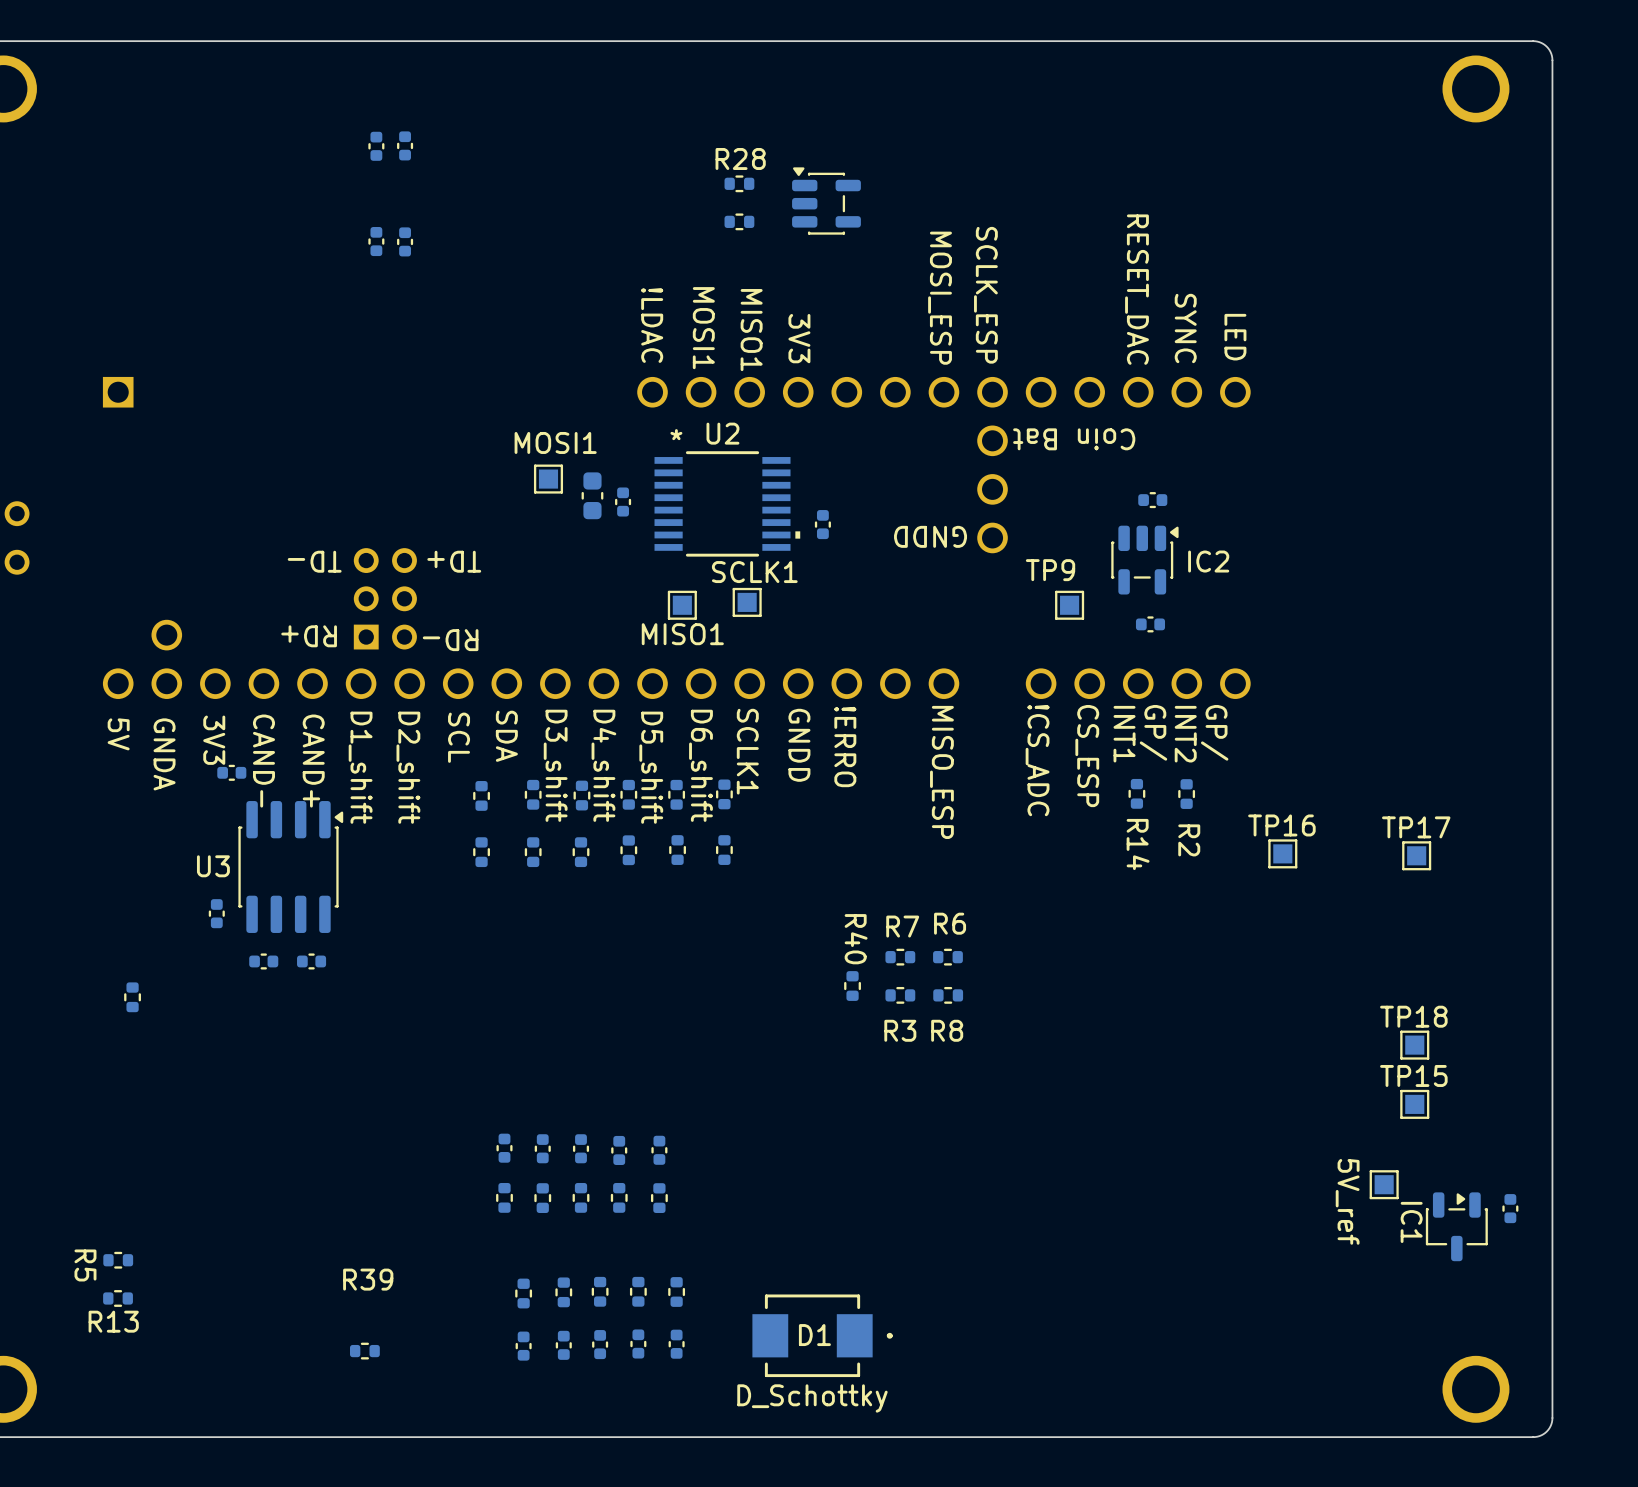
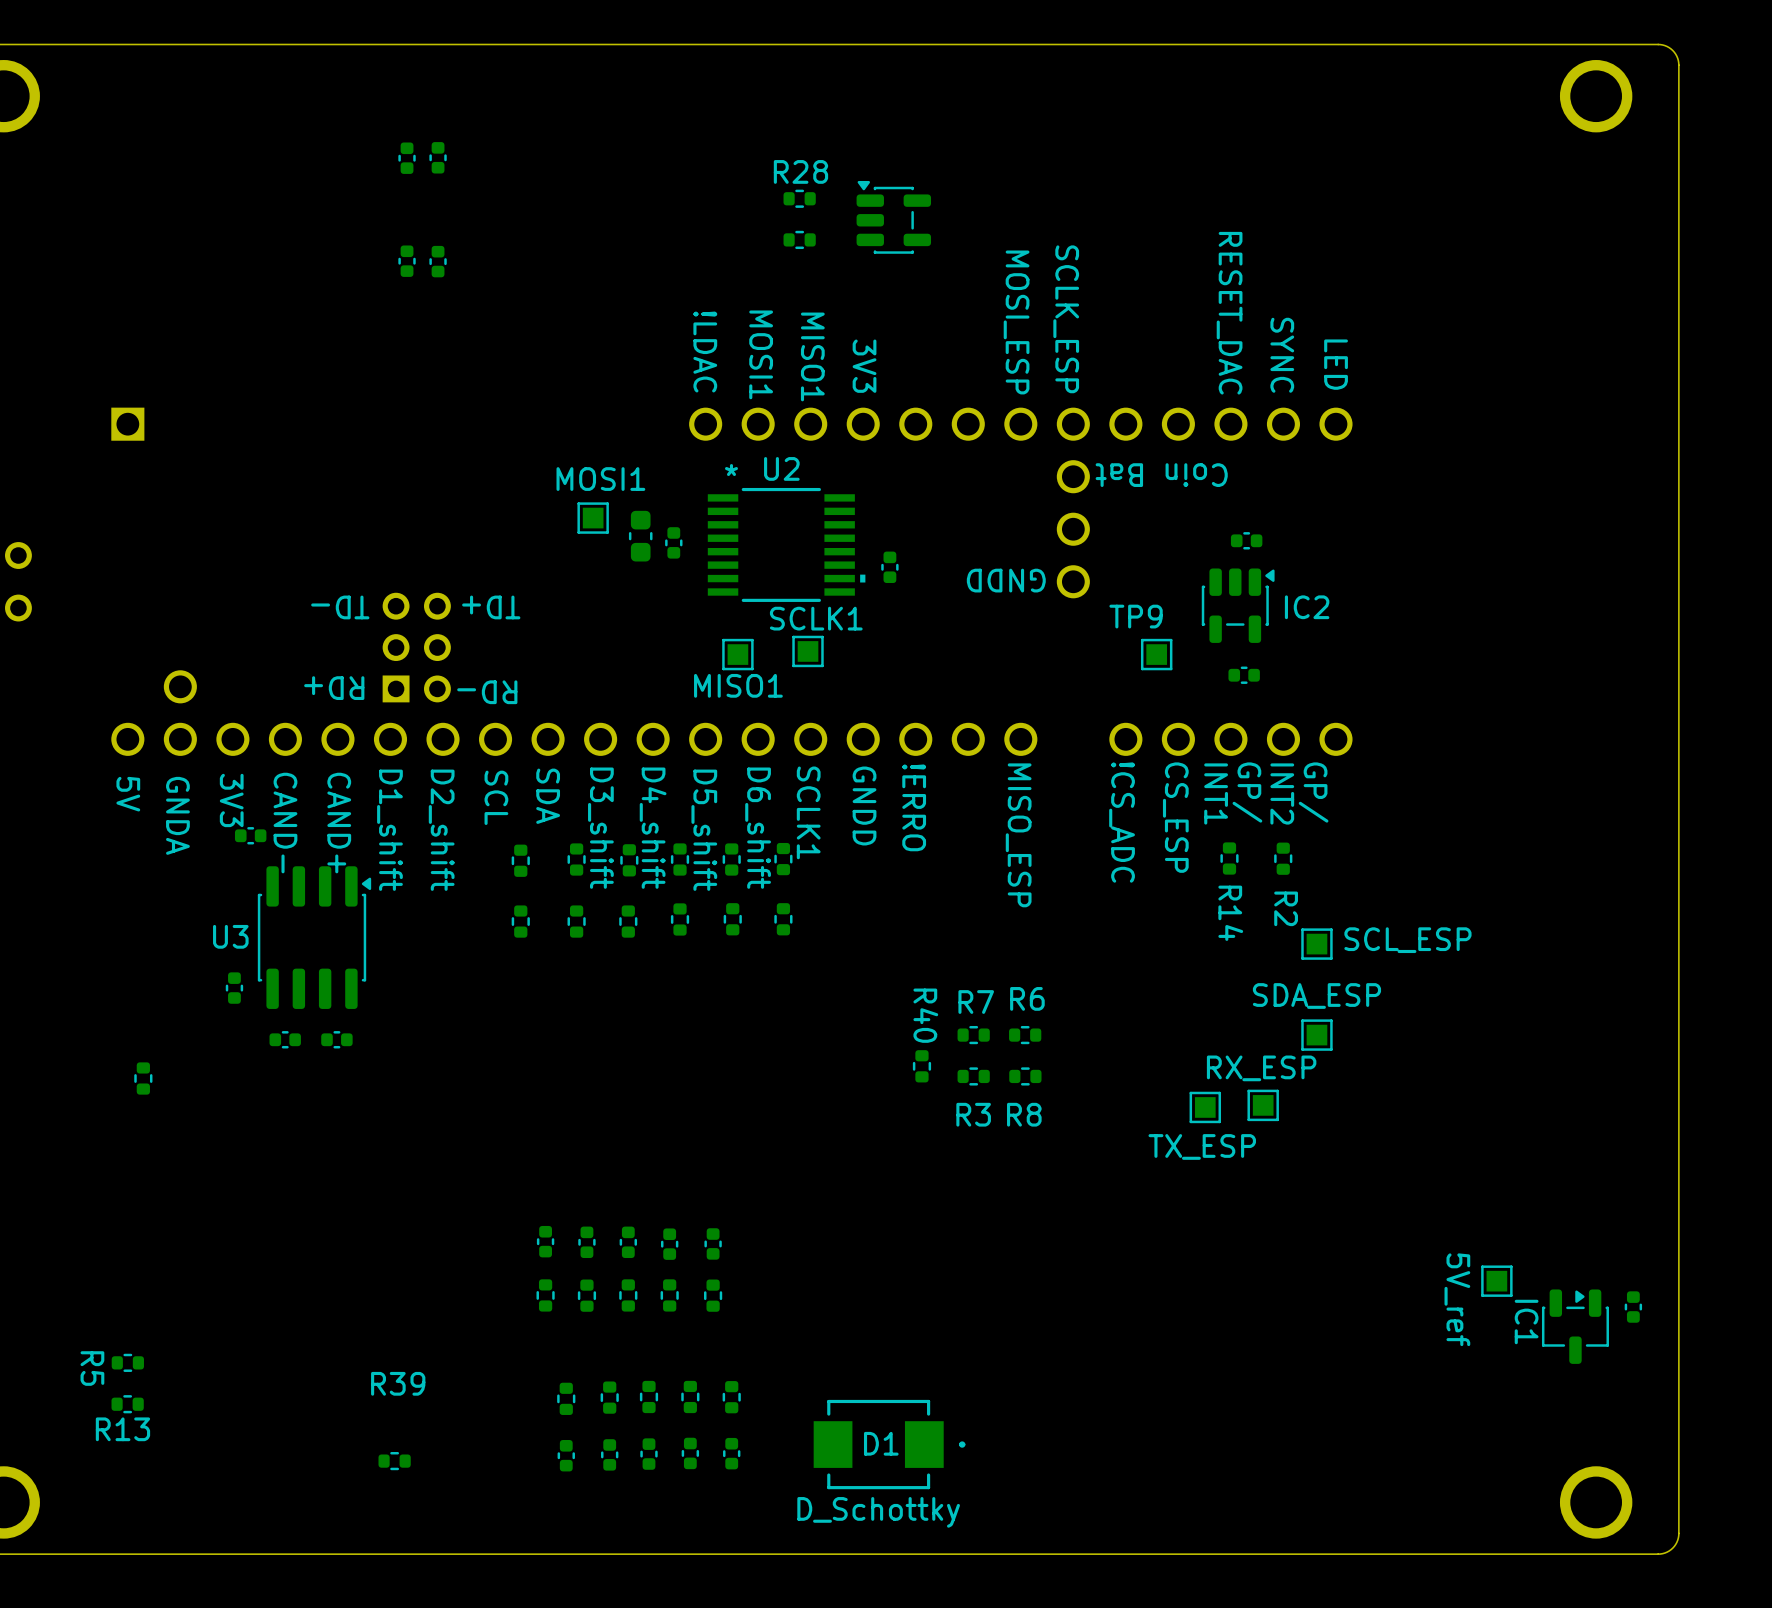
TP16: (1282, 853) -> none
TP17: (1416, 855) -> none
SCL_ESP: none -> (1316, 944)
SDA_ESP: none -> (1316, 1035)
RX_ESP: none -> (1263, 1105)
TX_ESP: none -> (1205, 1107)
TP18: (1414, 1045) -> none
TP15: (1414, 1104) -> none

